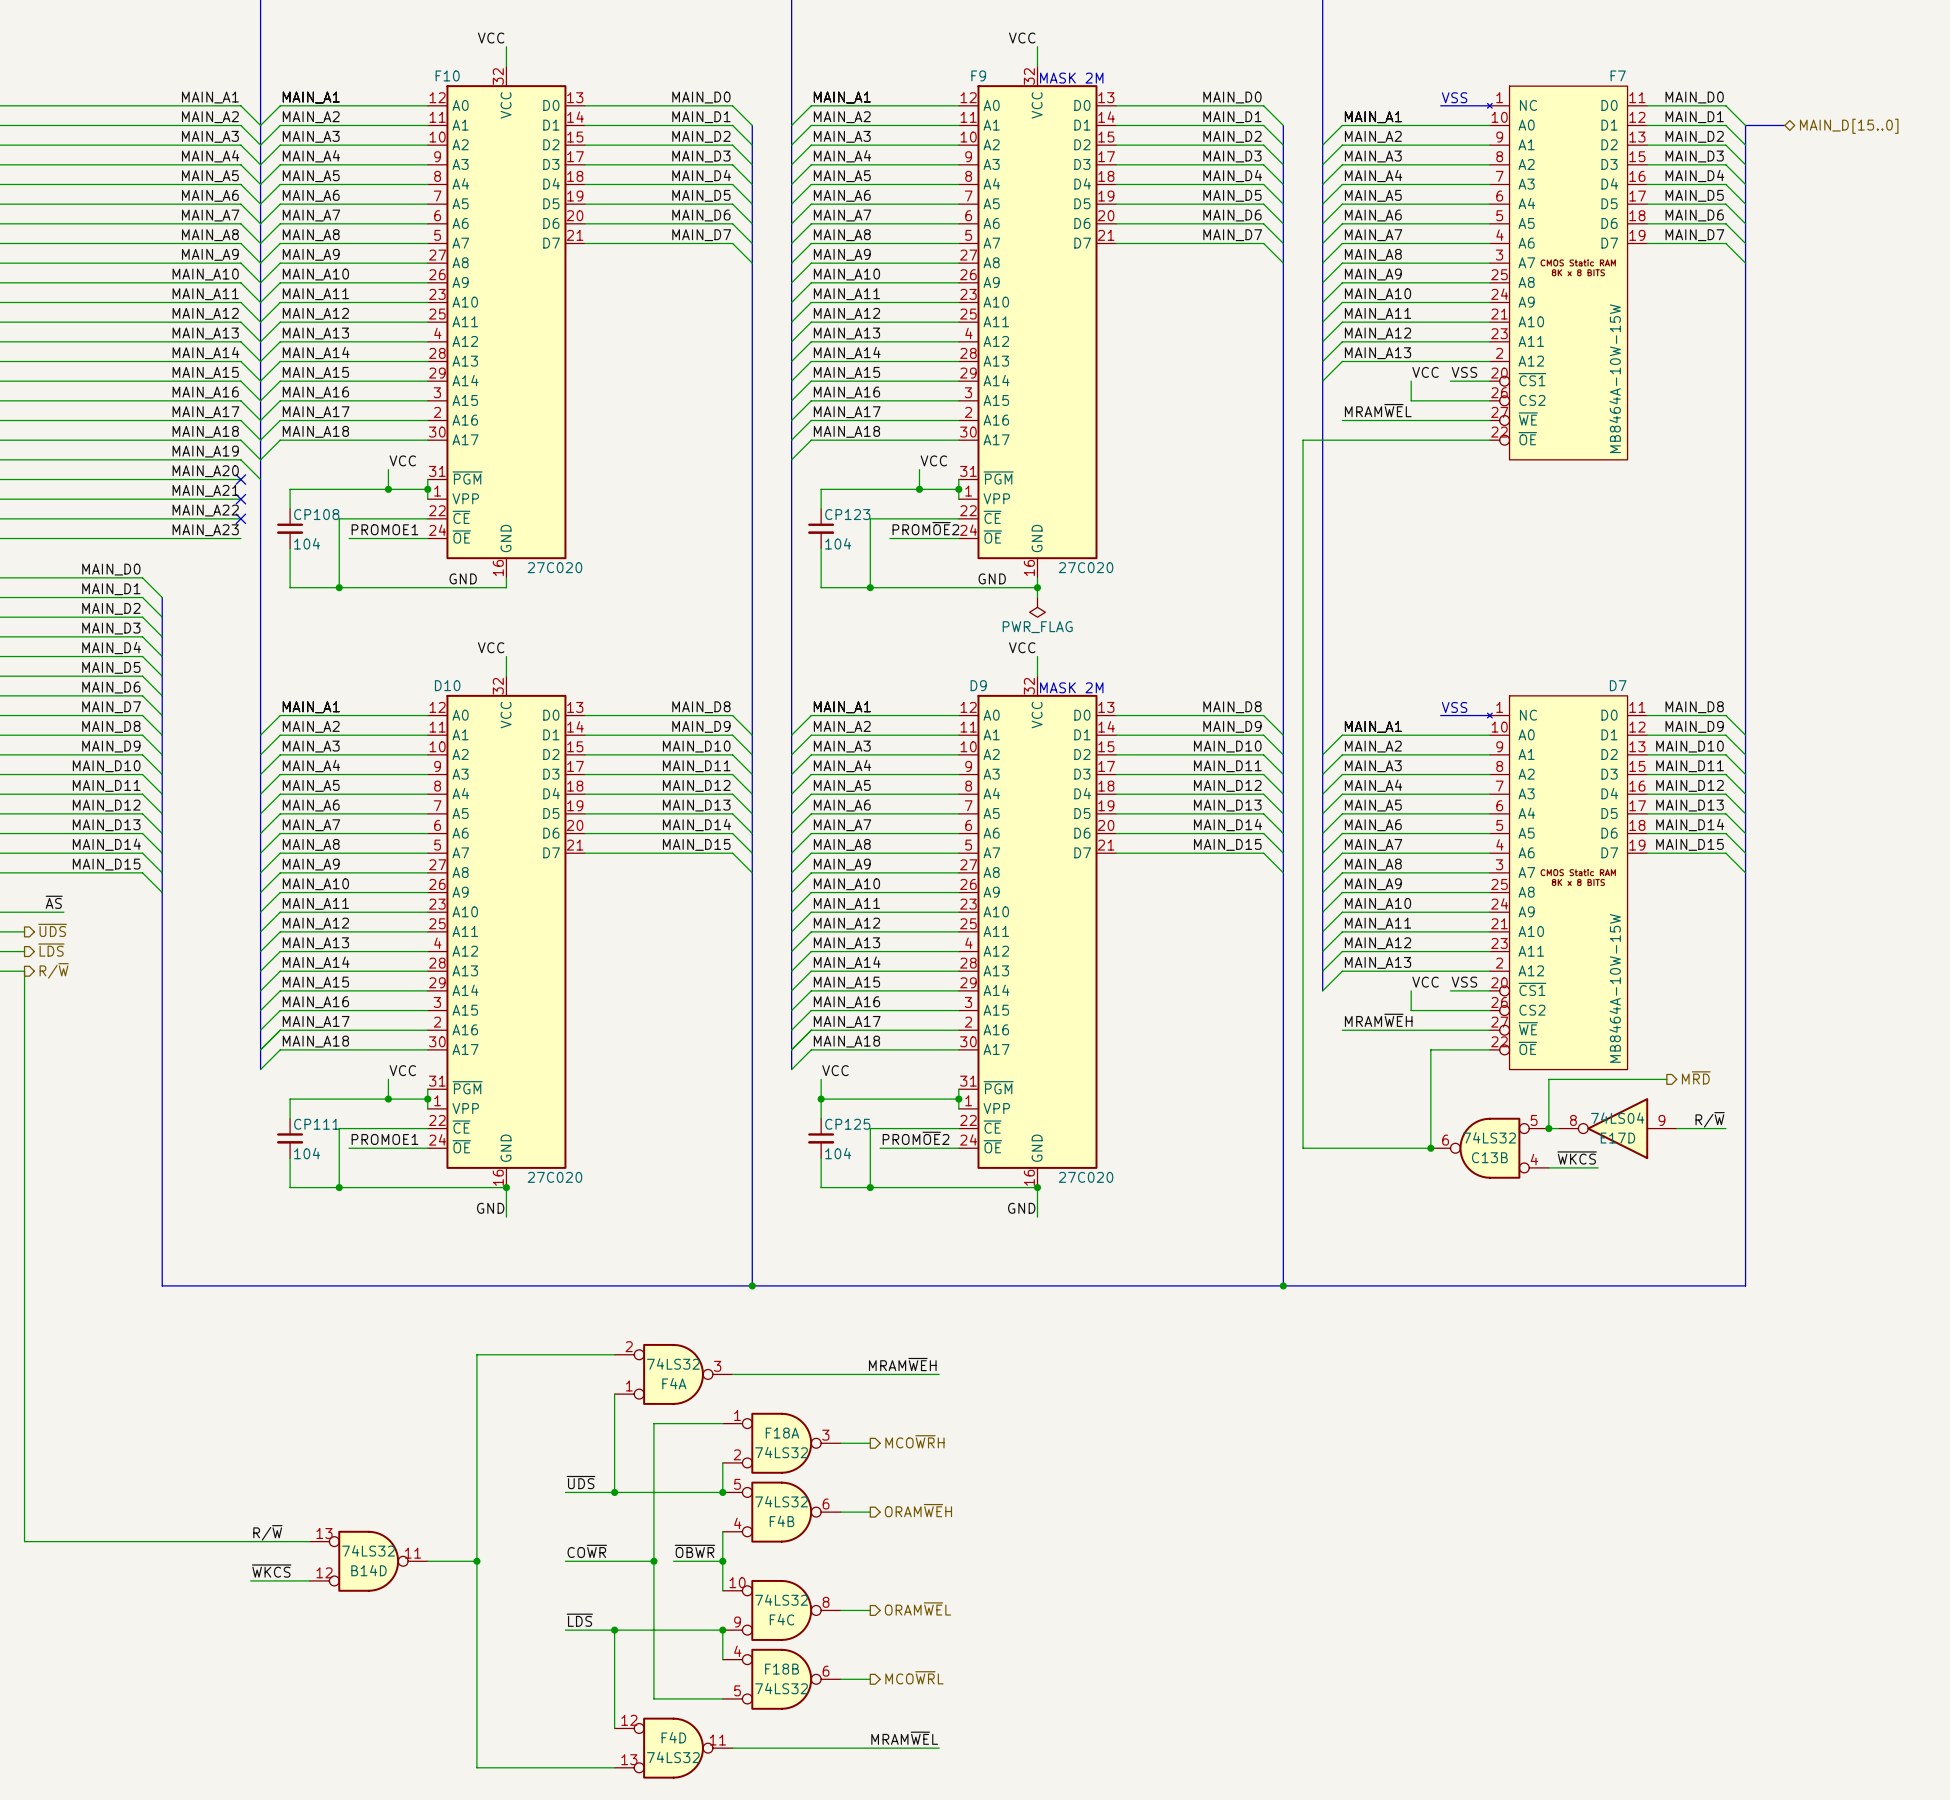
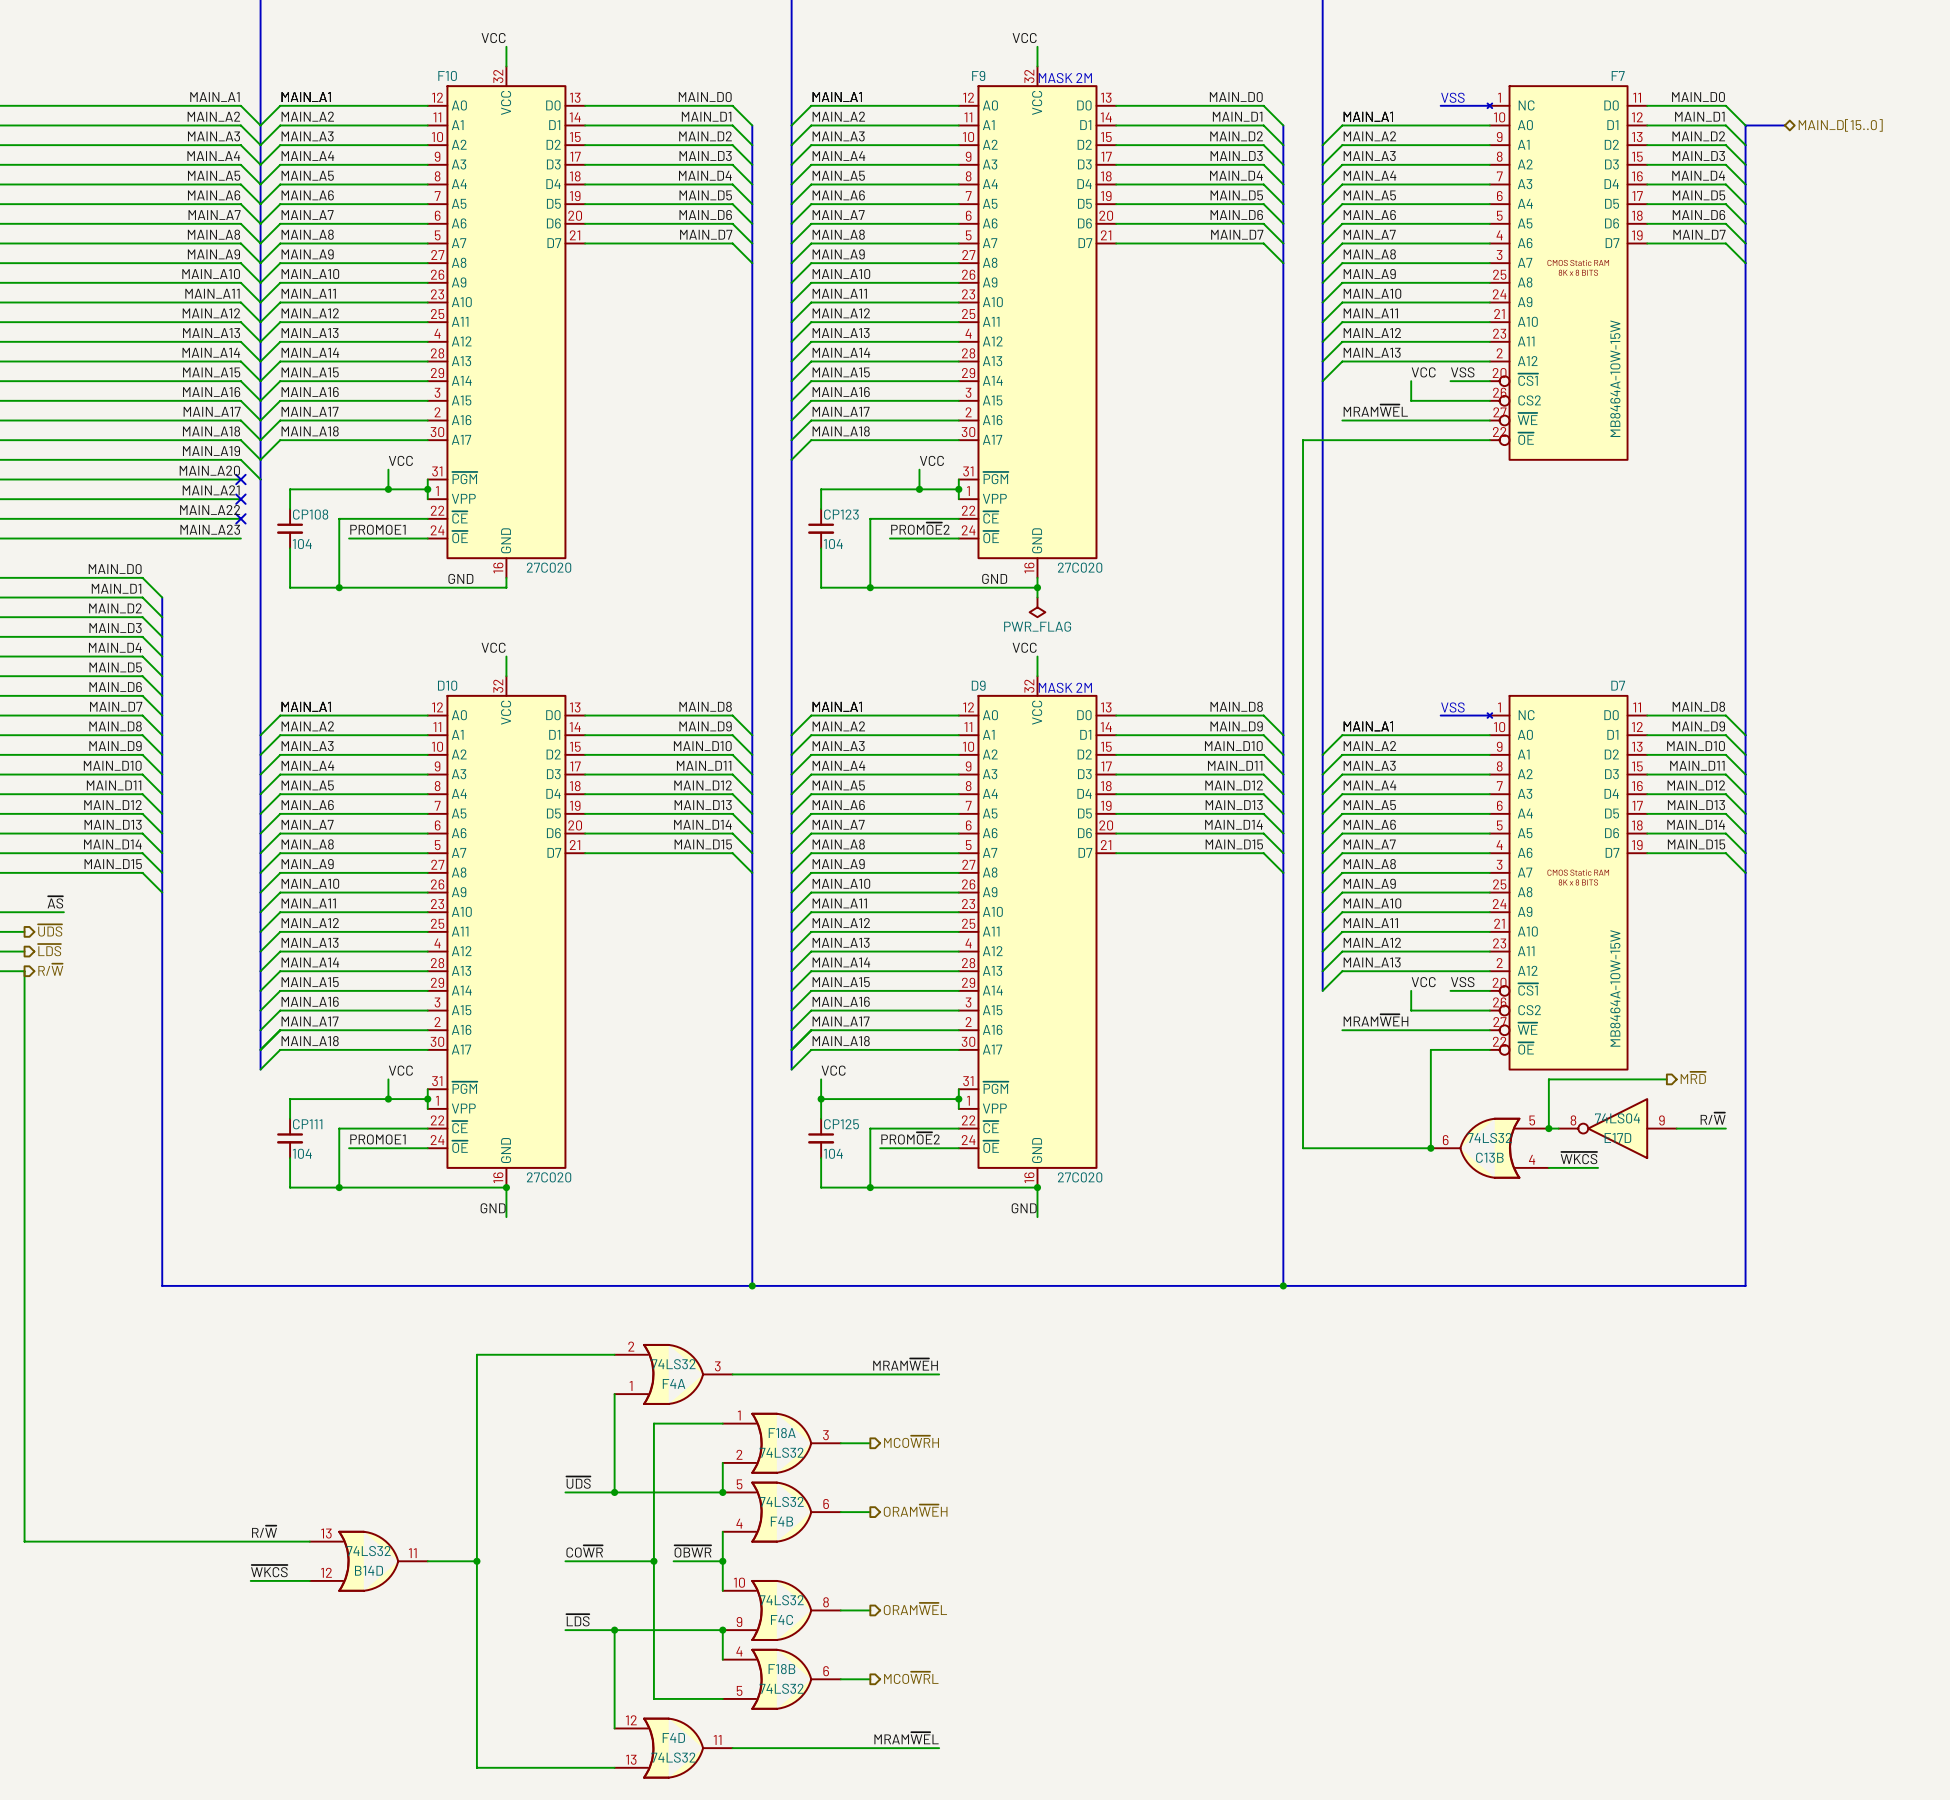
C13B symbol: [1430, 1117, 1549, 1179] -> [1430, 1117, 1549, 1179]
F4A symbol: [614, 1343, 733, 1405] -> [614, 1343, 733, 1405]
F18A symbol: [722, 1412, 841, 1474] -> [722, 1412, 841, 1474]
F4B symbol: [722, 1481, 841, 1543] -> [722, 1481, 841, 1543]
B14D symbol: [309, 1530, 428, 1592] -> [309, 1530, 428, 1592]
F4C symbol: [722, 1579, 841, 1641] -> [722, 1579, 841, 1641]
F18B symbol: [722, 1648, 841, 1710] -> [722, 1648, 841, 1710]
F4D symbol: [614, 1717, 733, 1779] -> [614, 1717, 733, 1779]

